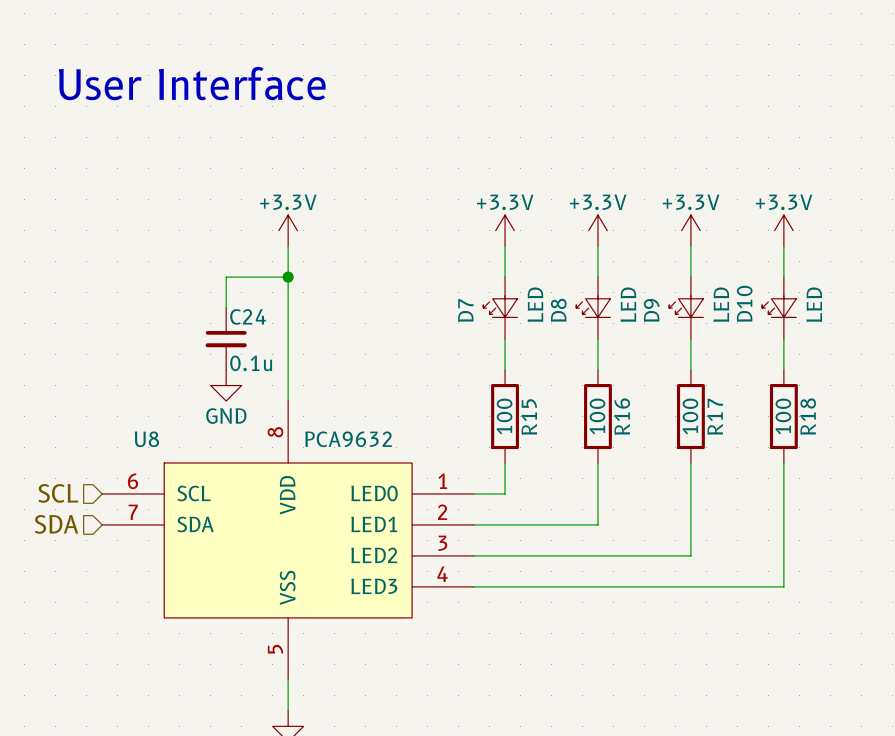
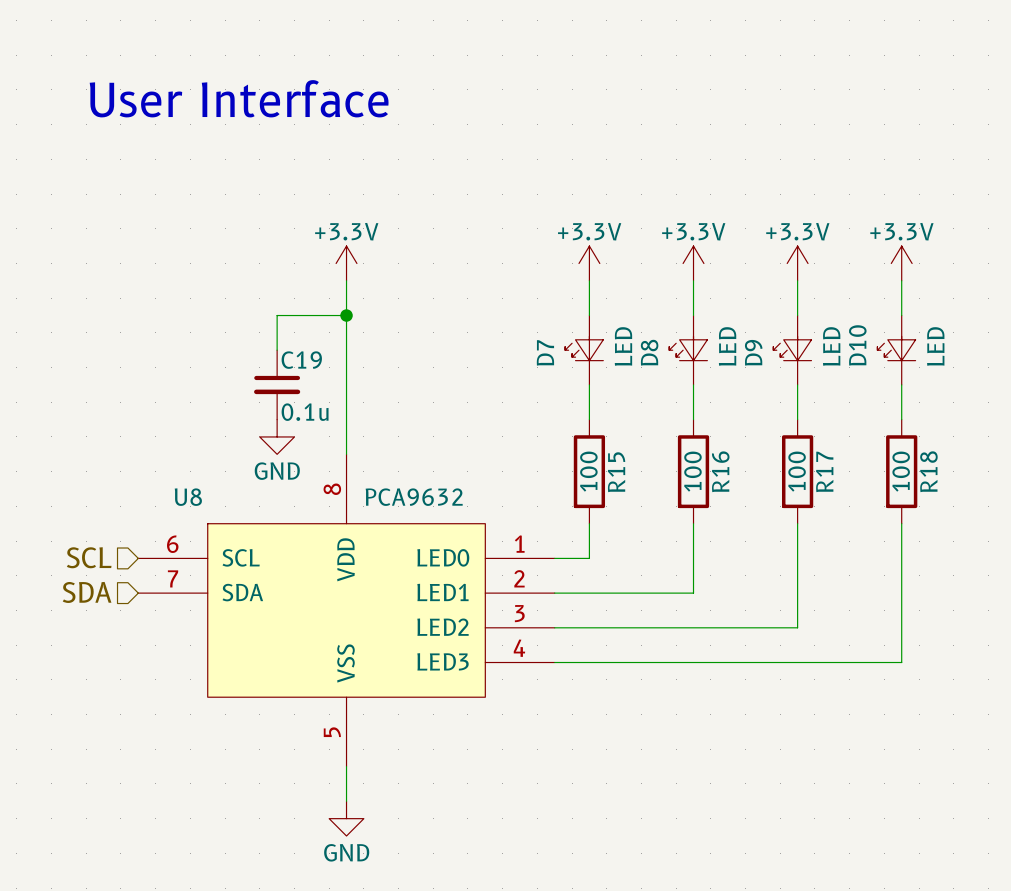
C24 name: C24 (248, 316) -> C19 (301, 360)

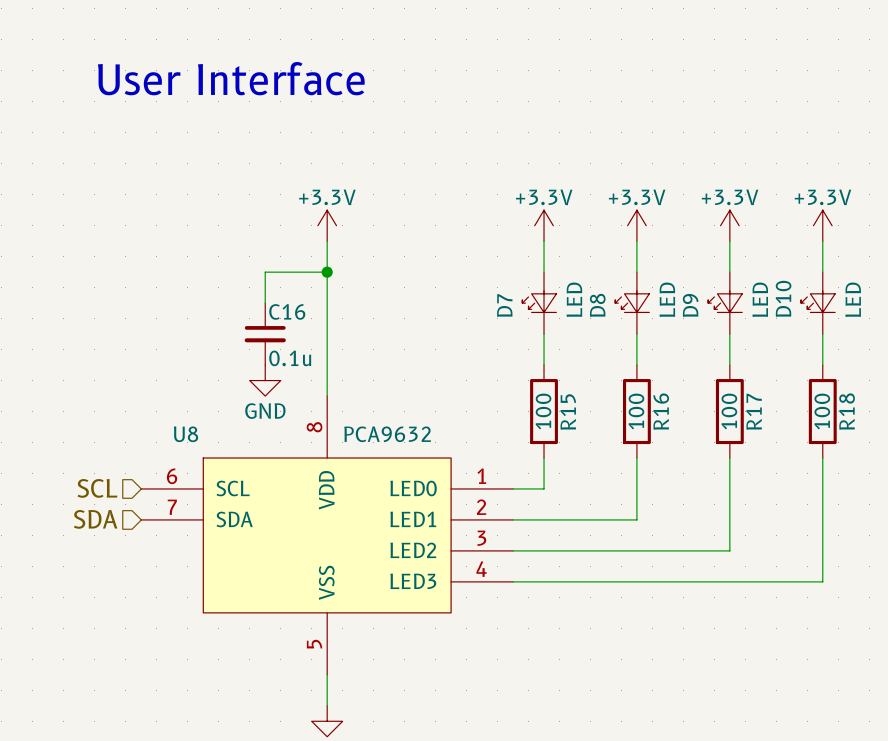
C19 name: C19 (301, 360) -> C16 (287, 311)

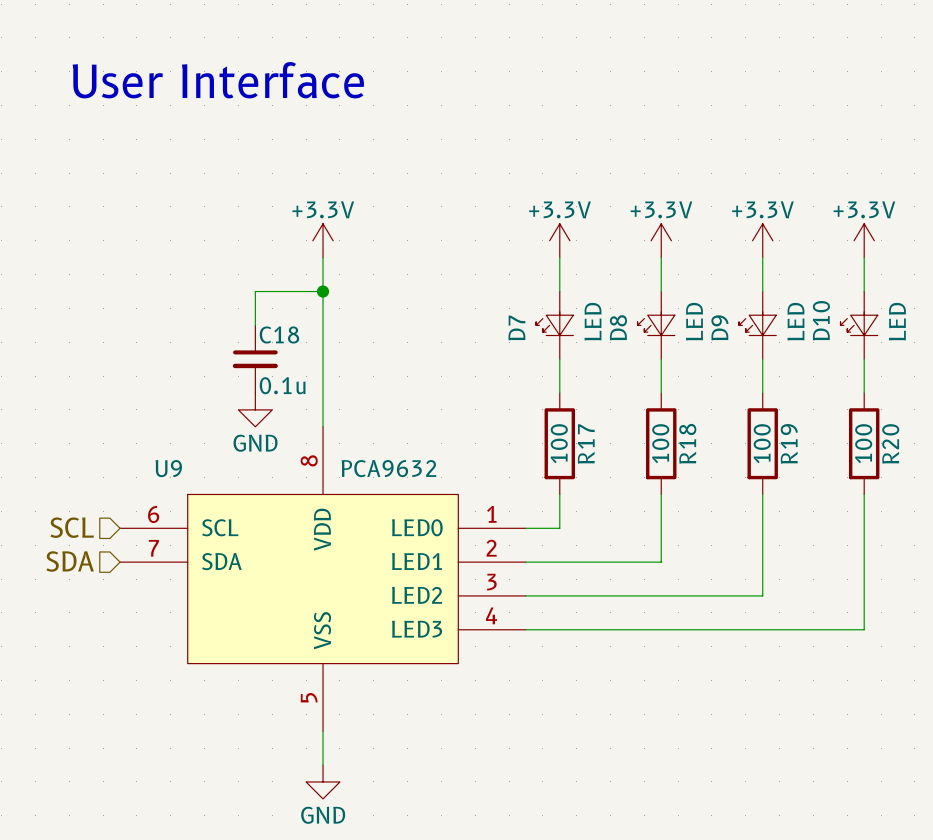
C16 name: C16 (287, 311) -> C18 (279, 334)
R16 name: R16 (661, 411) -> R18 (687, 443)
R17 name: R17 (754, 411) -> R19 (789, 443)
R18 name: R18 (847, 411) -> R20 (890, 443)
R15 name: R15 (568, 412) -> R17 (586, 443)
U8 name: U8 (185, 434) -> U9 (168, 468)

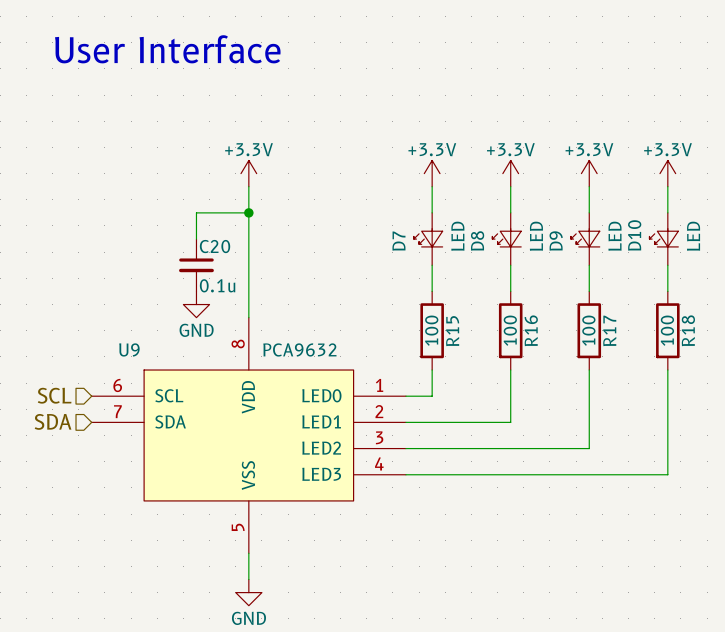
C18 name: C18 (279, 334) -> C20 (215, 246)
R17 name: R17 (586, 443) -> R15 (452, 331)
R18 name: R18 (687, 443) -> R16 (531, 330)
R19 name: R19 (789, 443) -> R17 (609, 330)
R20 name: R20 (890, 443) -> R18 (688, 330)

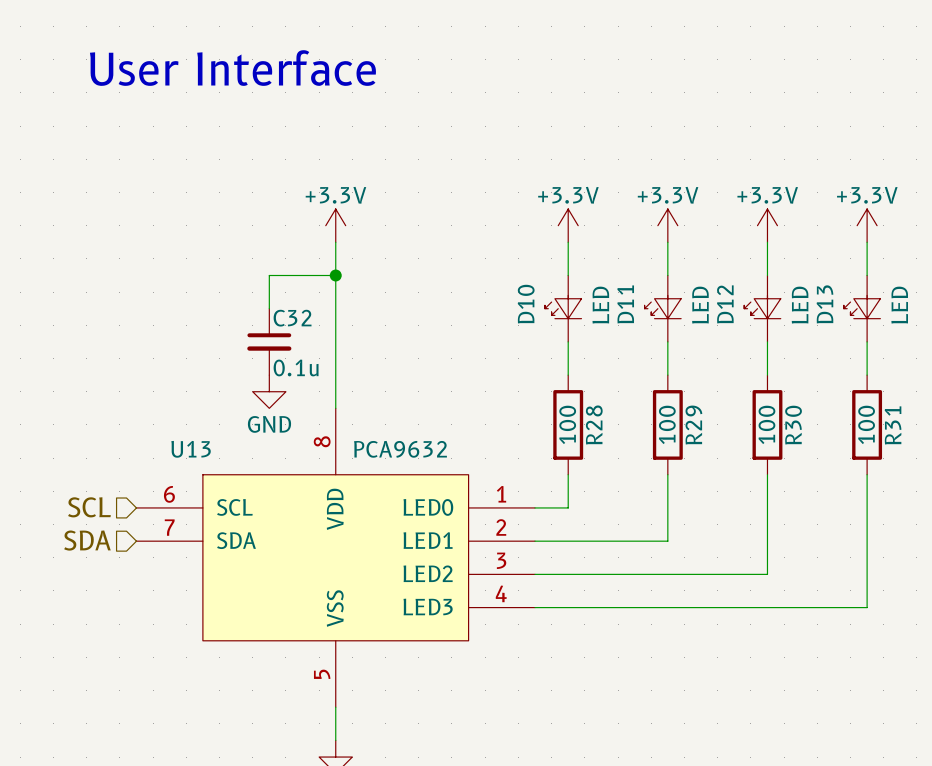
D10 name: D10 (634, 235) -> D13 (824, 304)
D8 name: D8 (477, 240) -> D11 (625, 304)
D7 name: D7 (398, 241) -> D10 (526, 304)
D9 name: D9 (556, 241) -> D12 (725, 304)
C20 name: C20 (215, 246) -> C32 (292, 318)
R16 name: R16 (531, 330) -> R29 (693, 425)
R17 name: R17 (609, 330) -> R30 (793, 425)
R18 name: R18 (688, 330) -> R31 (893, 425)
R15 name: R15 (452, 331) -> R28 (594, 425)
U9 name: U9 (129, 349) -> U13 (191, 449)

